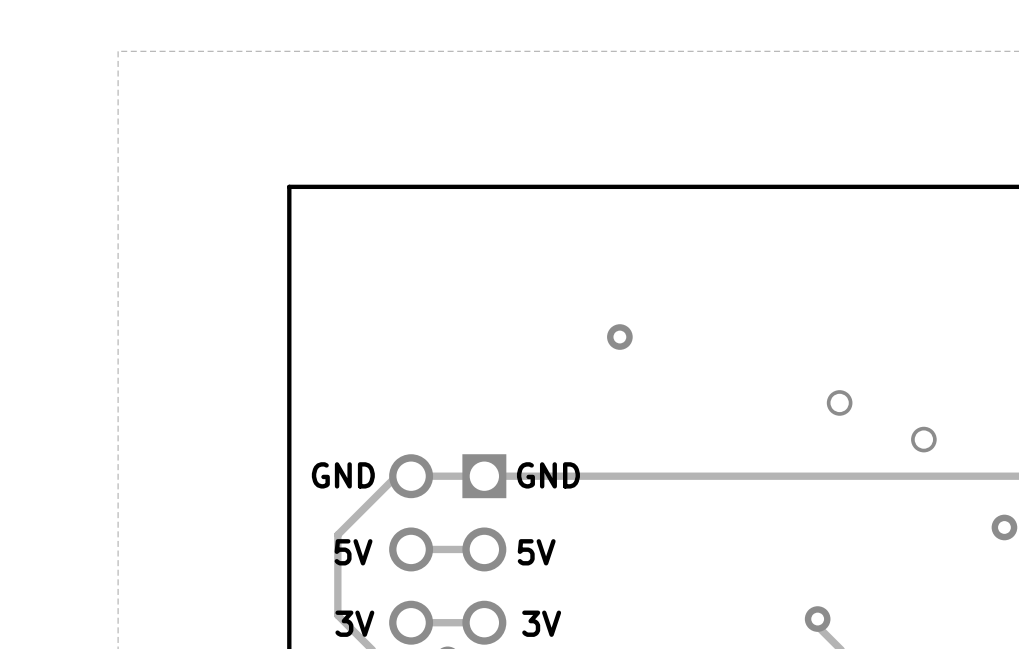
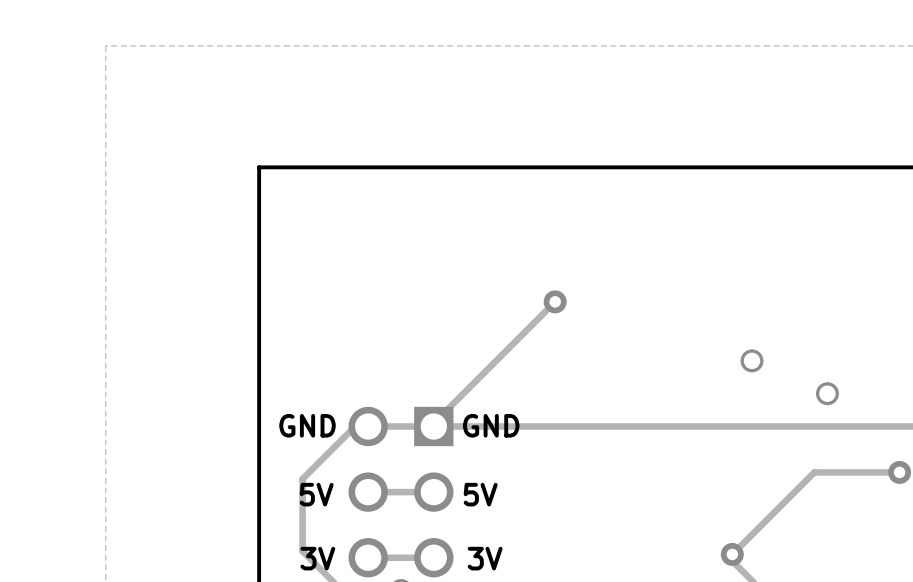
track: none -> (555, 301) (433, 423) (433, 426)
track: none -> (899, 472) (814, 472) (732, 554)

